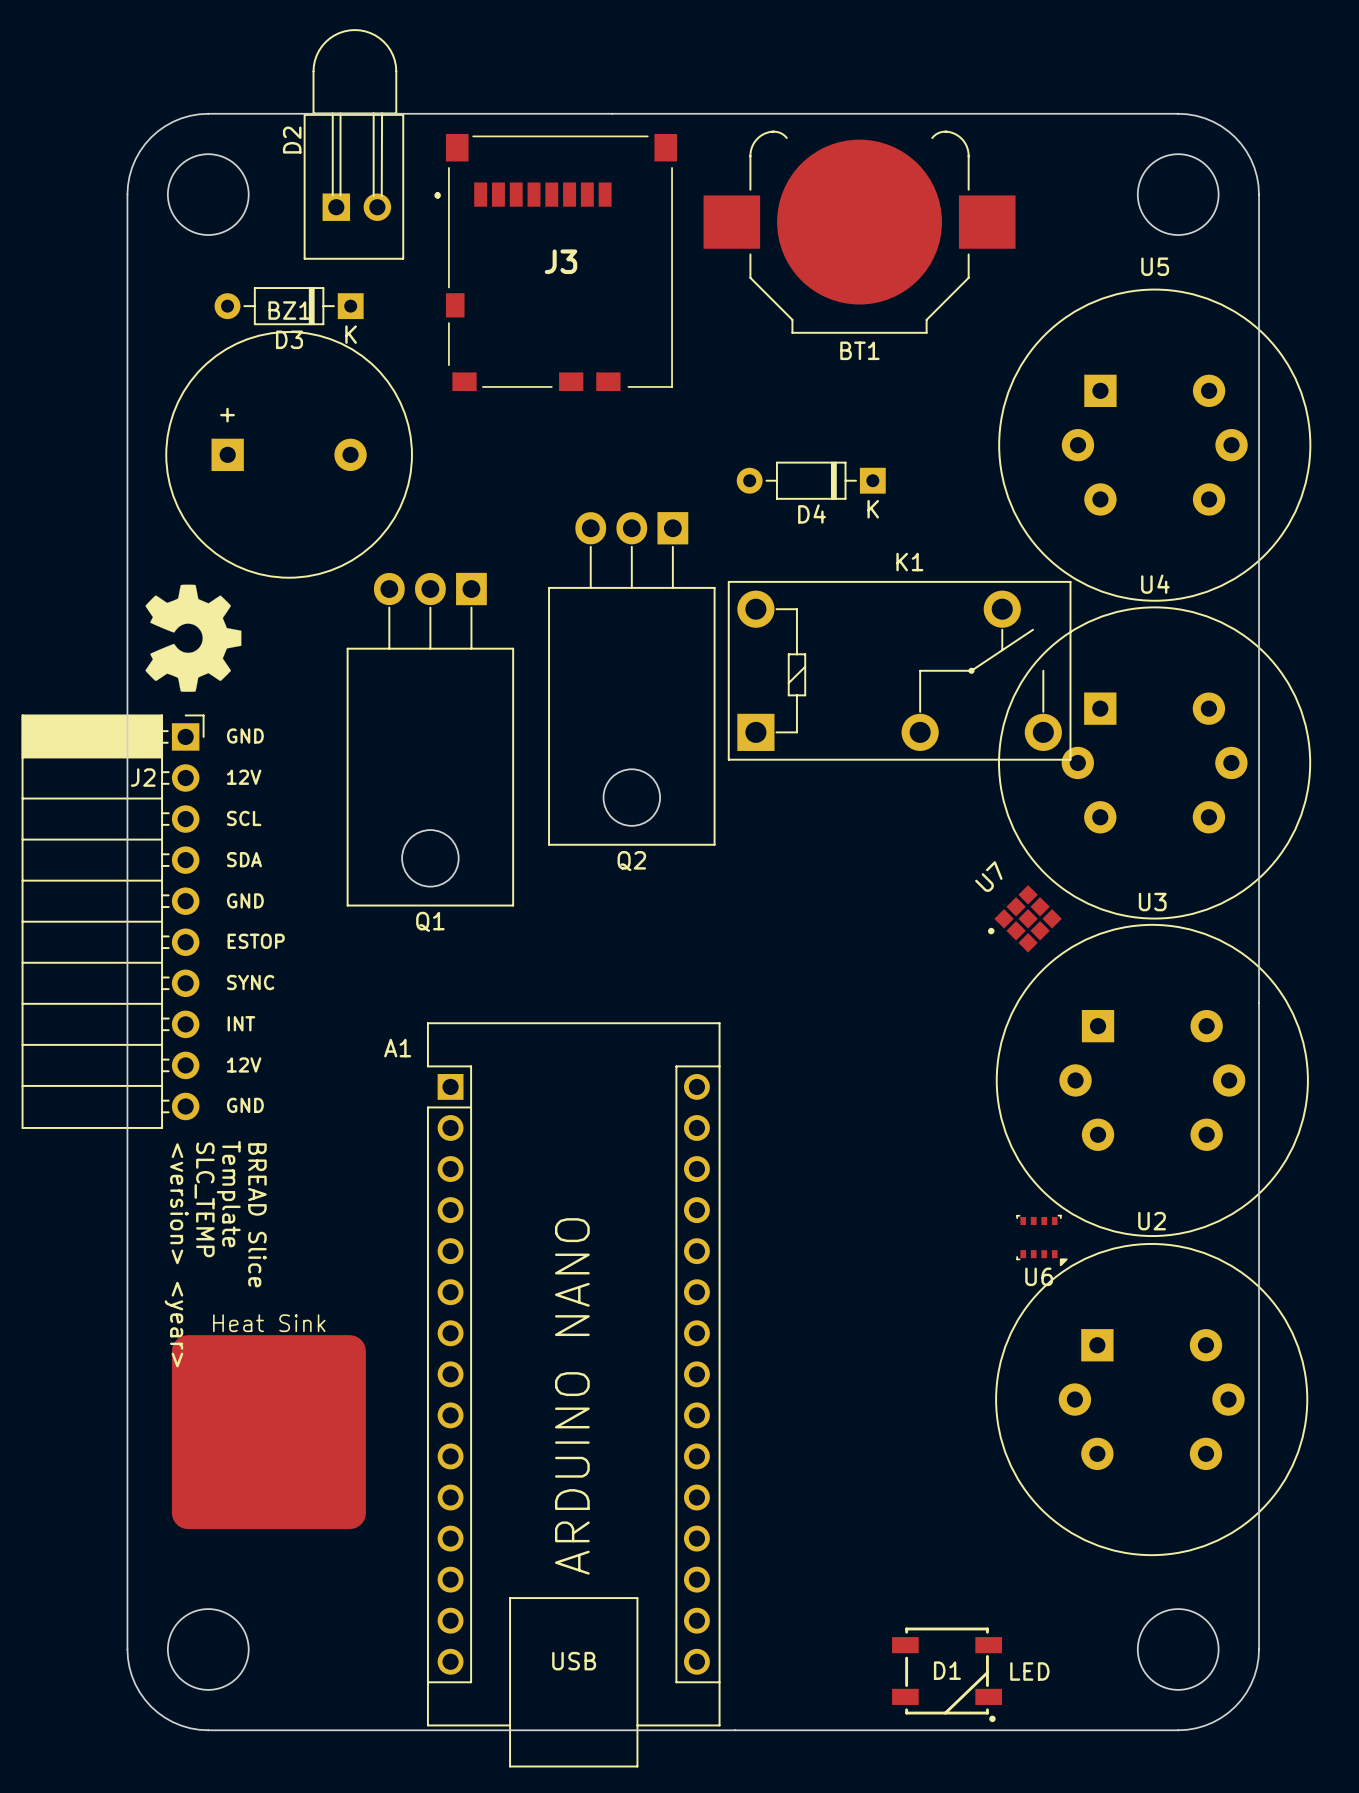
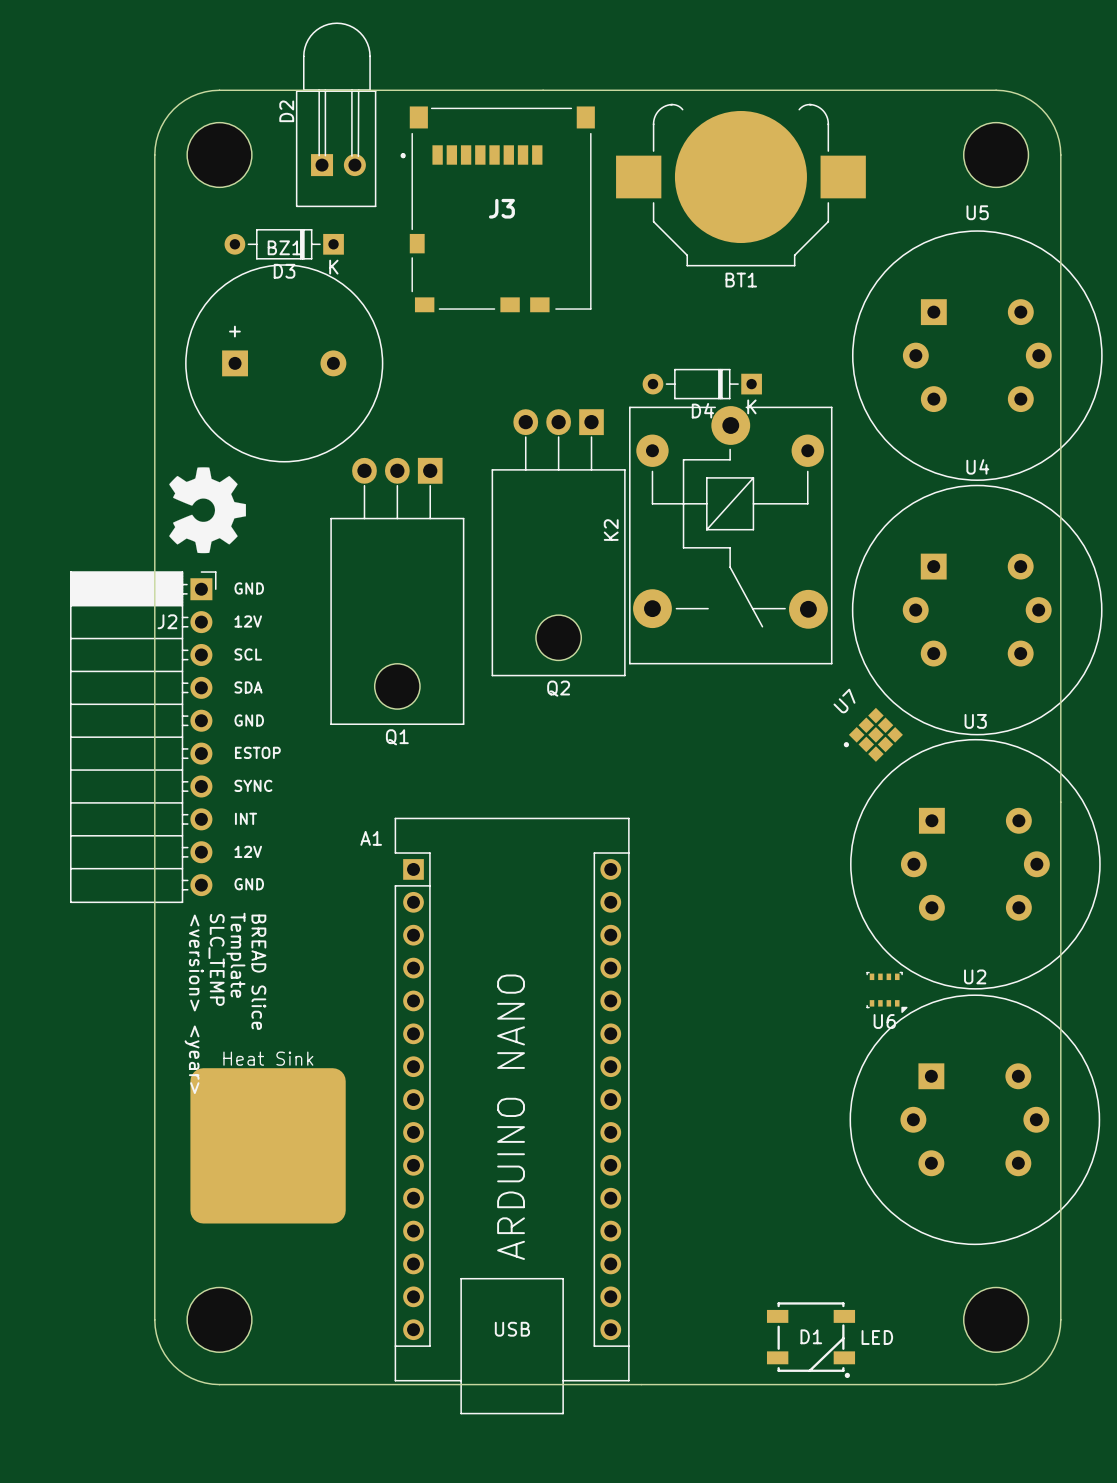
K2: none -> (730, 535)
K1: (899, 670) -> none

